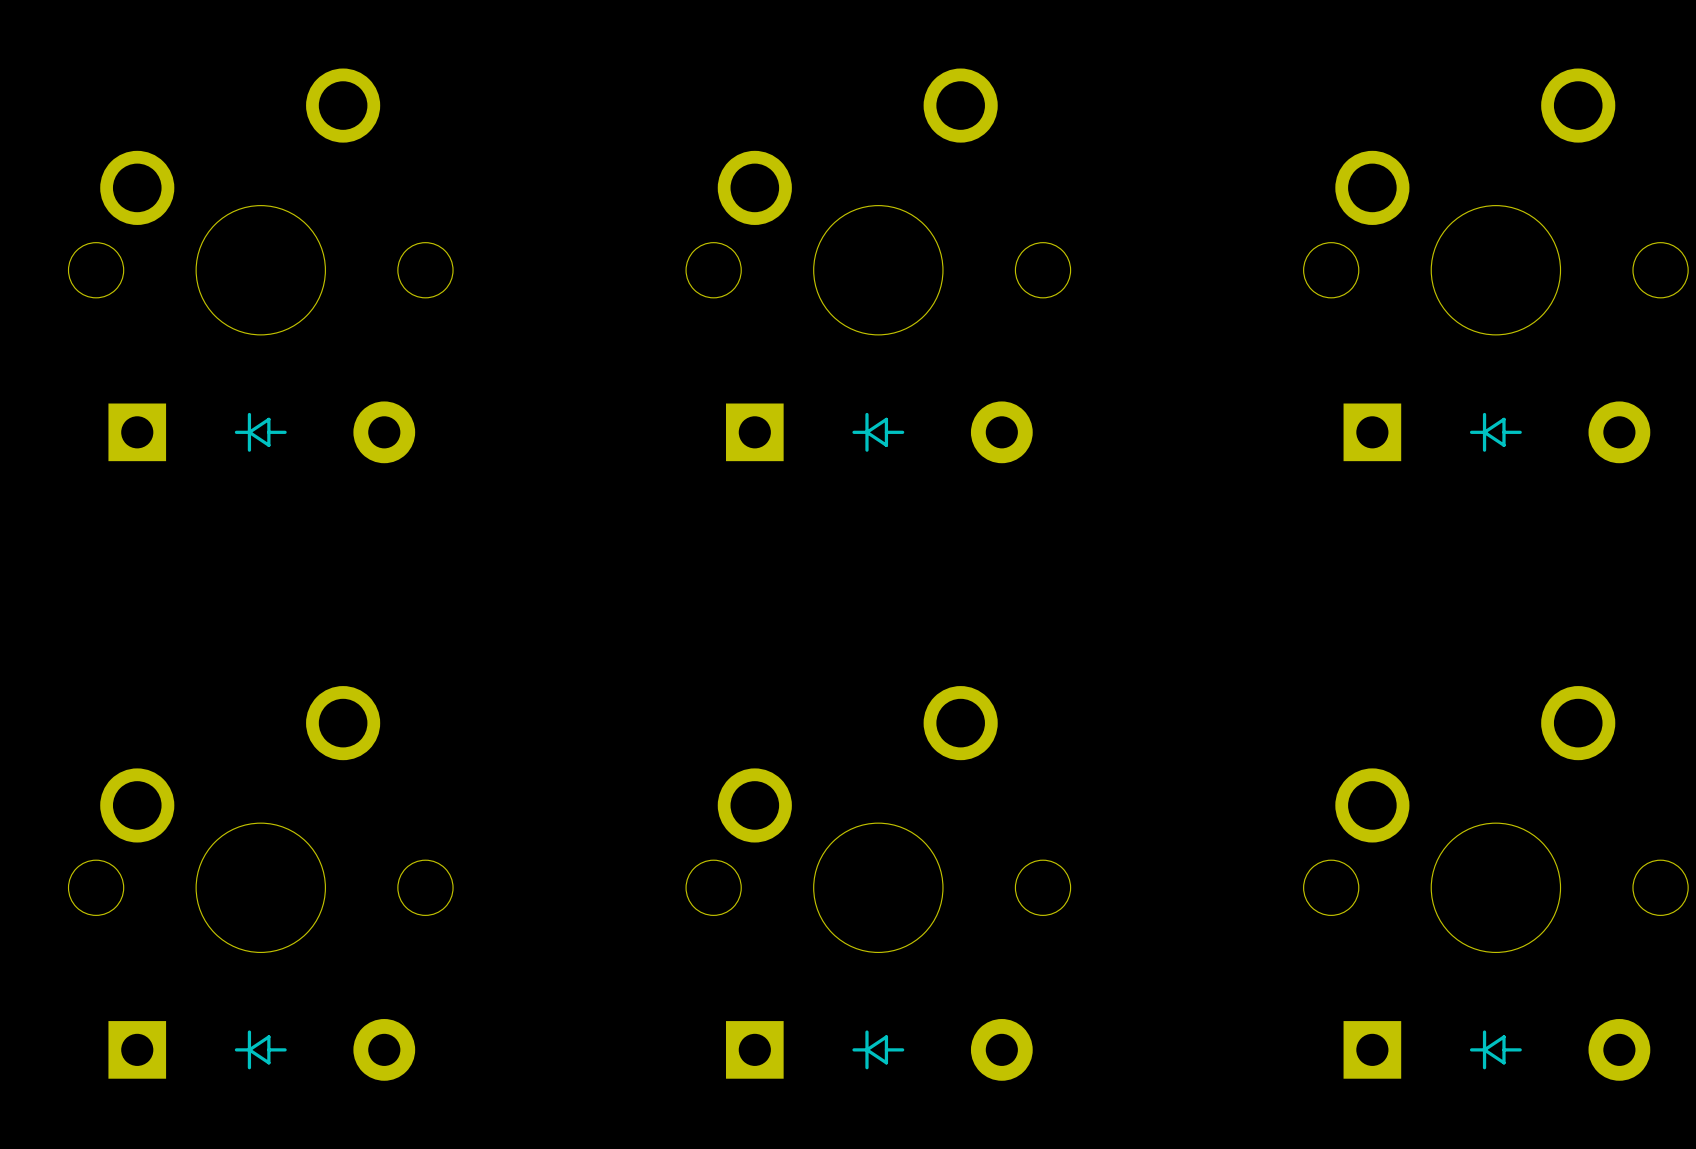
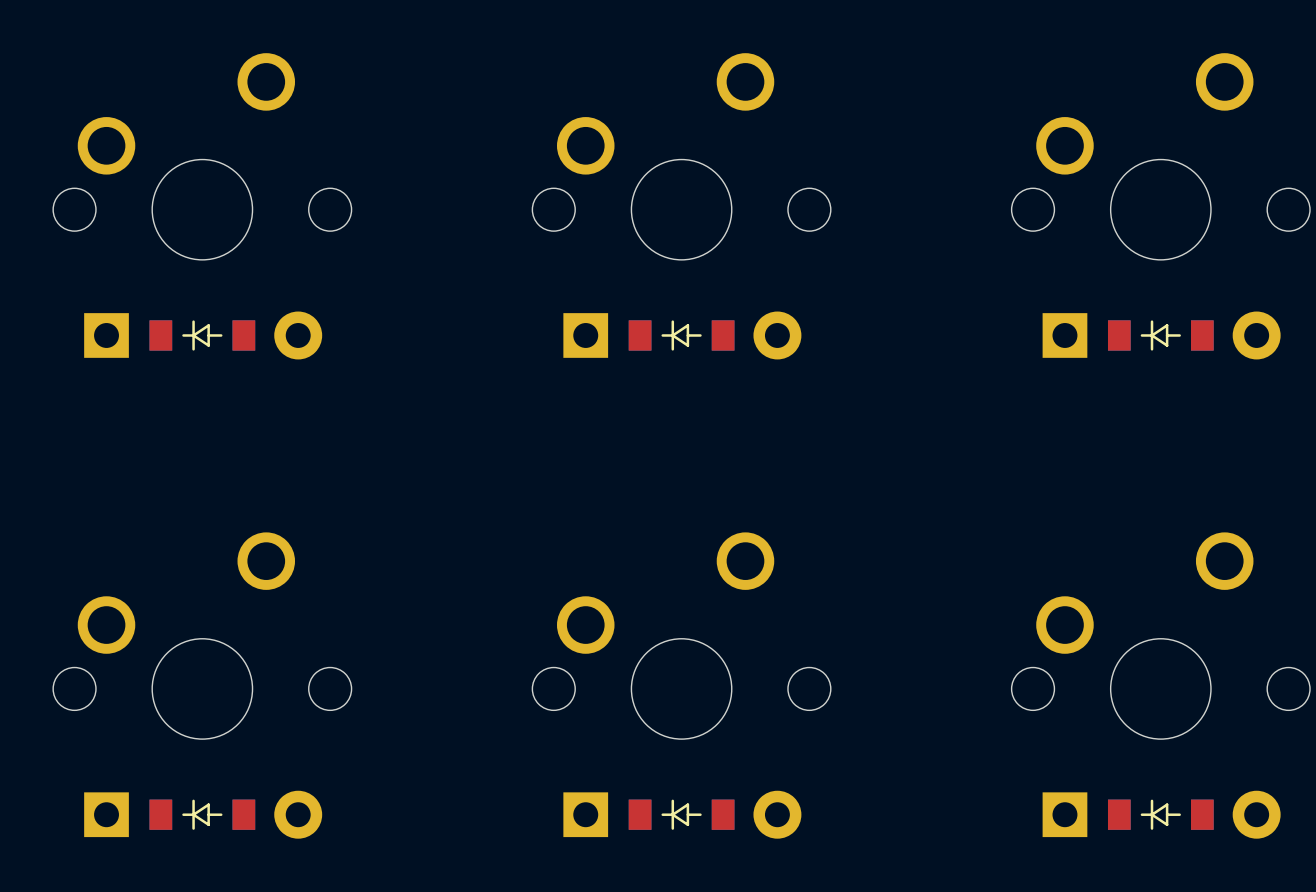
part footprint: [108, 401, 416, 464] -> [84, 311, 323, 360]
part footprint: [726, 401, 1033, 464] -> [563, 311, 802, 360]
part footprint: [1343, 401, 1651, 464] -> [1042, 311, 1281, 360]
part footprint: [108, 1019, 416, 1081] -> [84, 790, 323, 839]
part footprint: [726, 1019, 1033, 1081] -> [563, 790, 802, 839]
part footprint: [1343, 1019, 1651, 1081] -> [1042, 790, 1281, 839]

